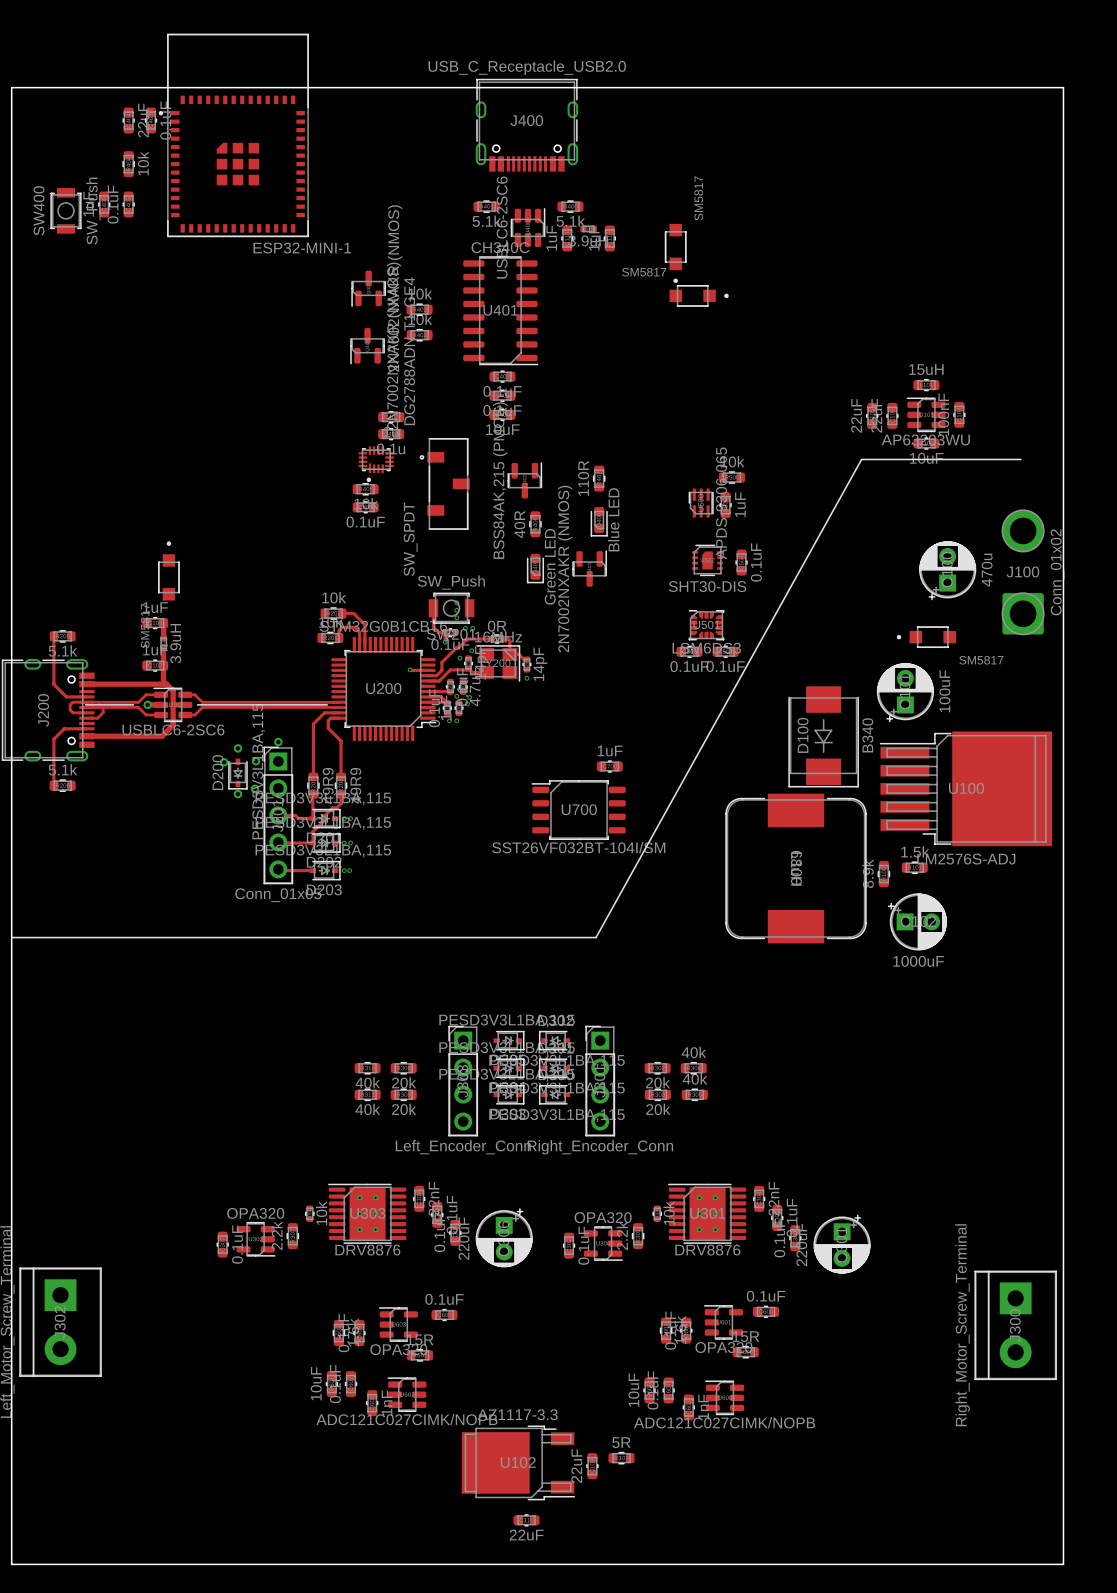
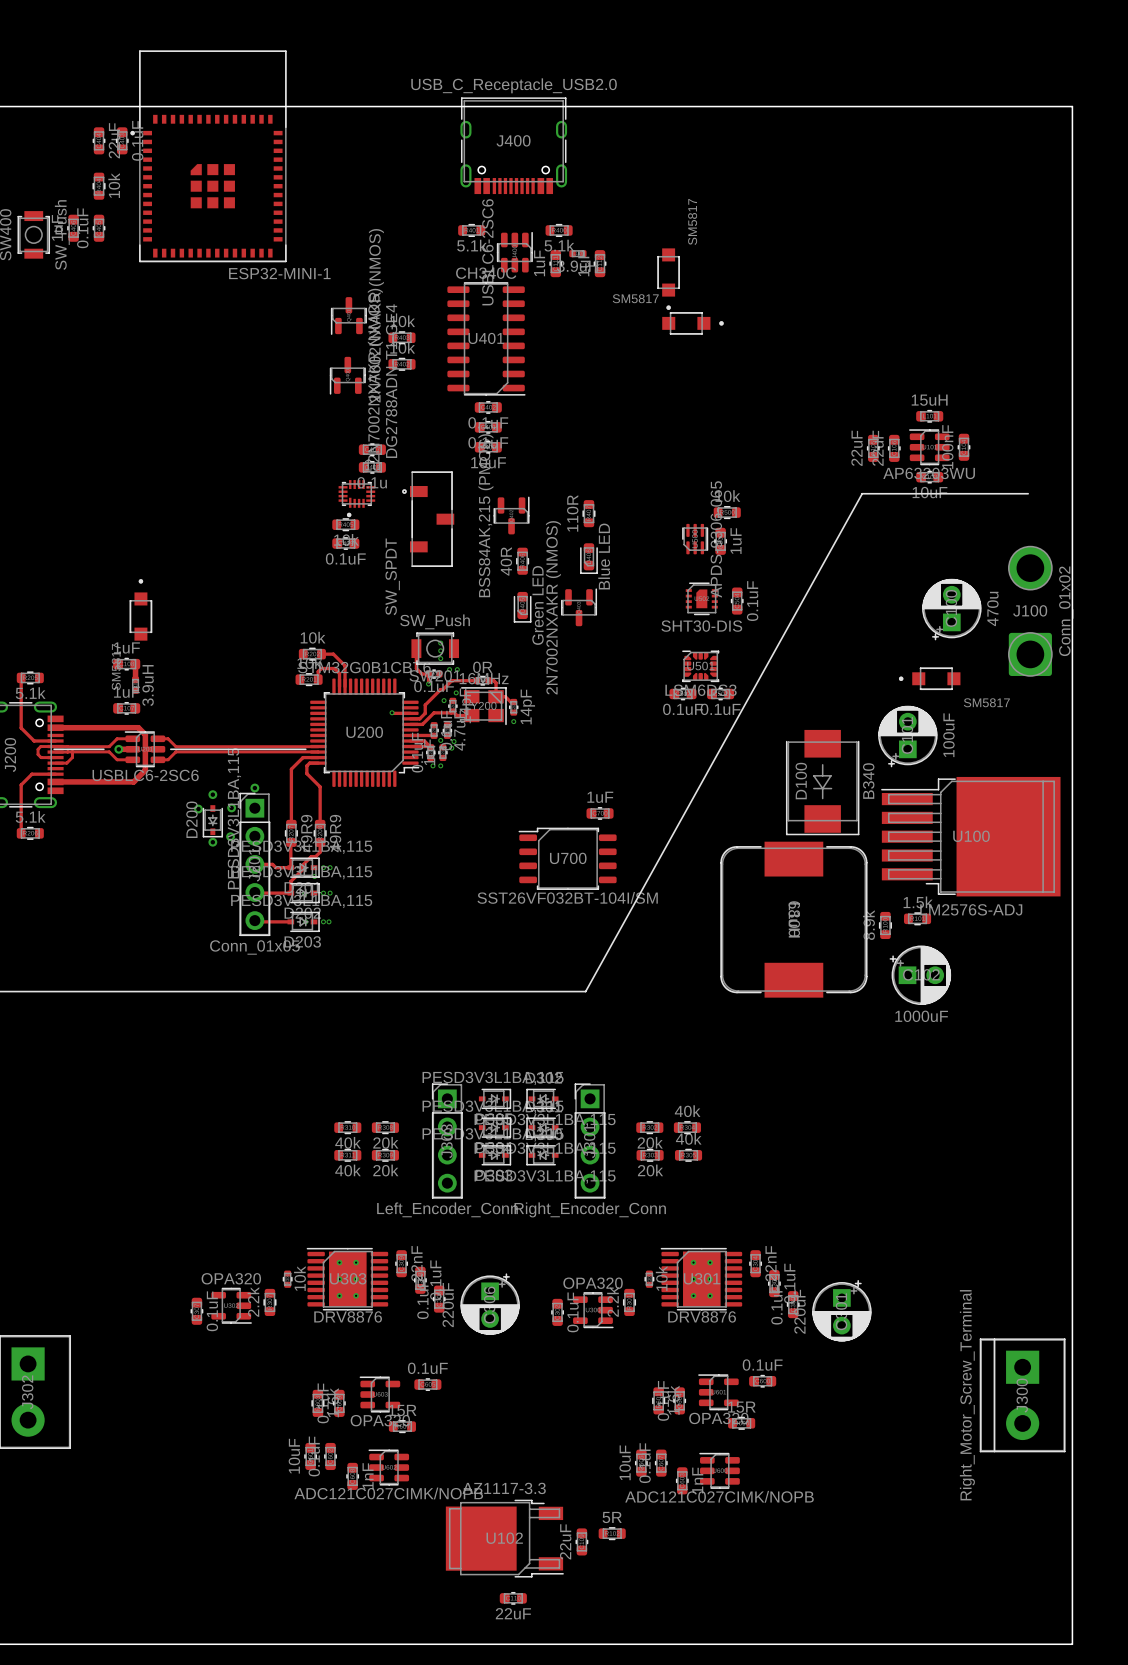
track: (163, 648) (163, 684) -> none

